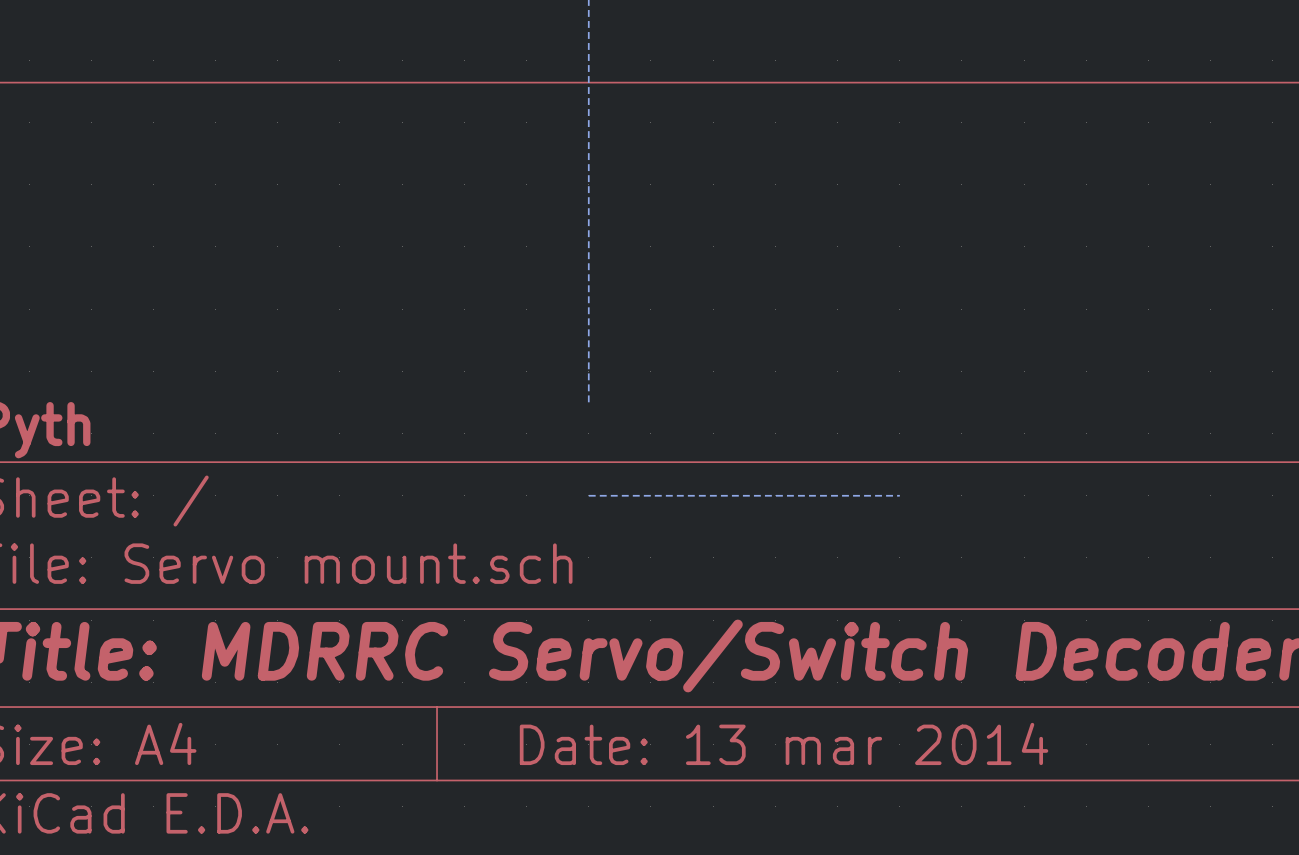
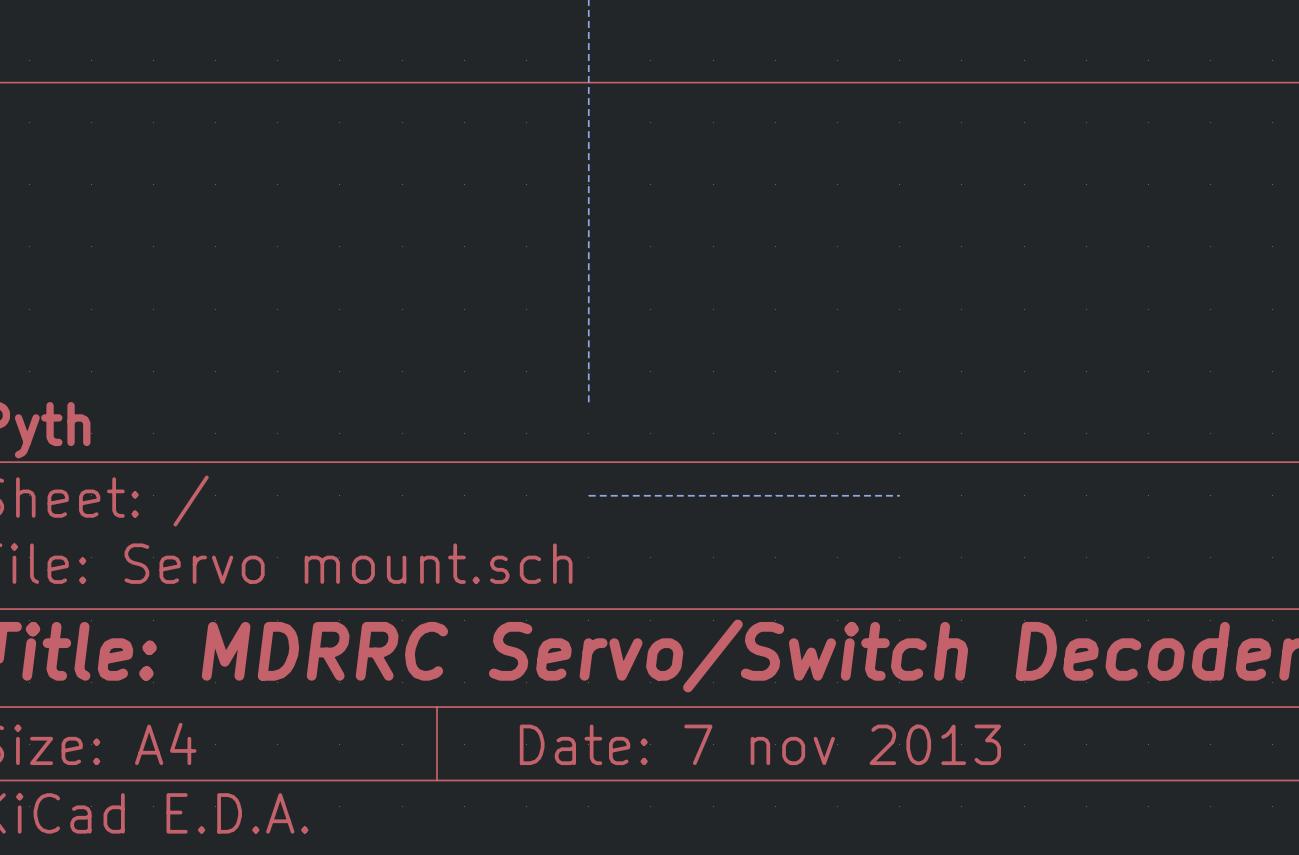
title block: Date: 13 mar 2014 (784, 743) -> Date: 7 nov 2013 (760, 744)

